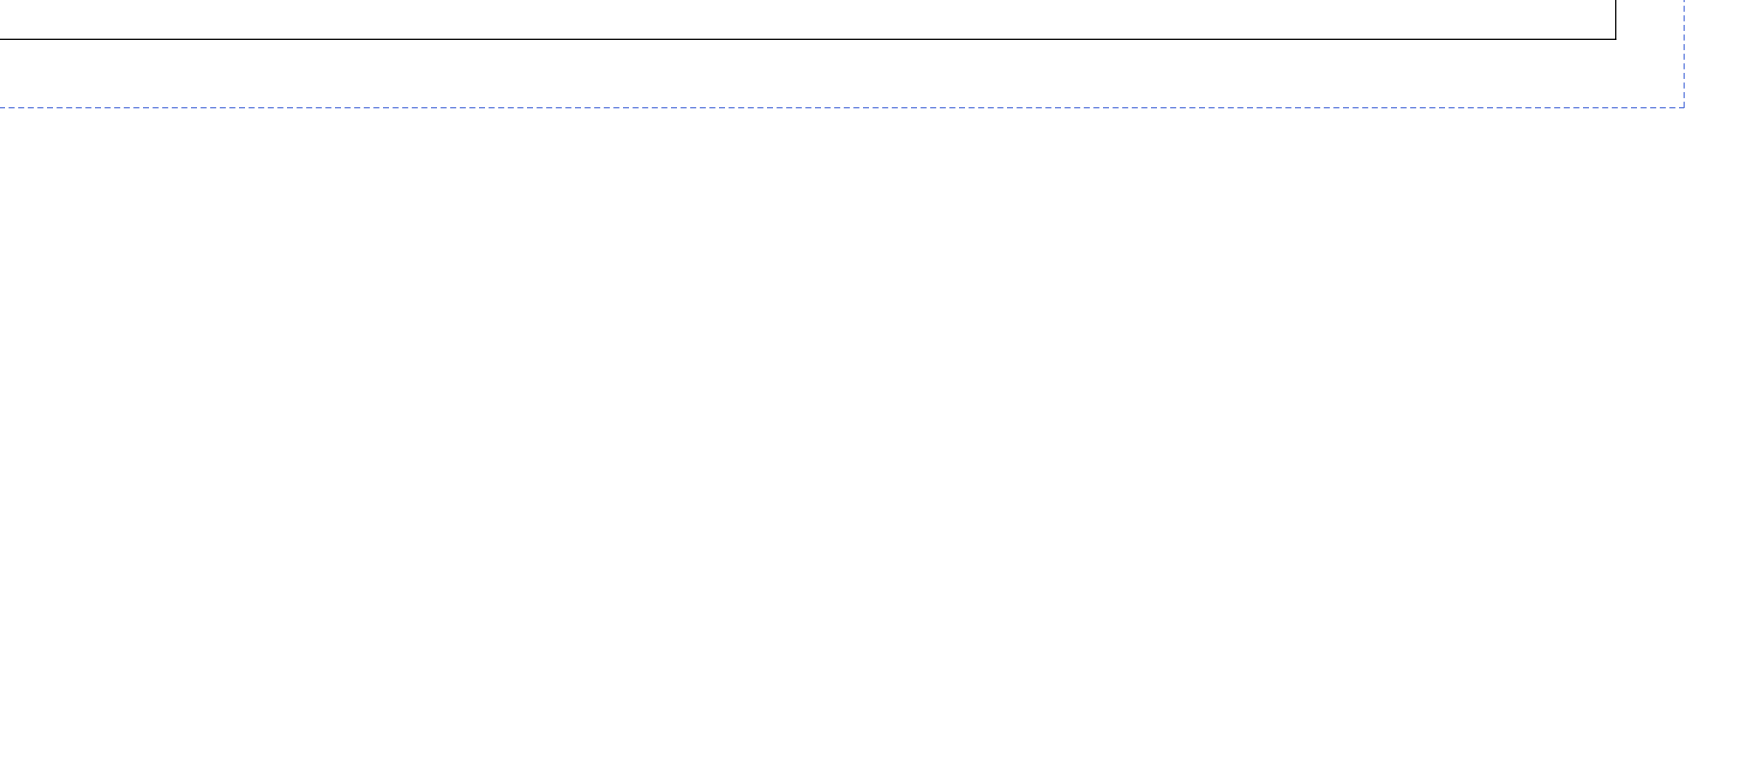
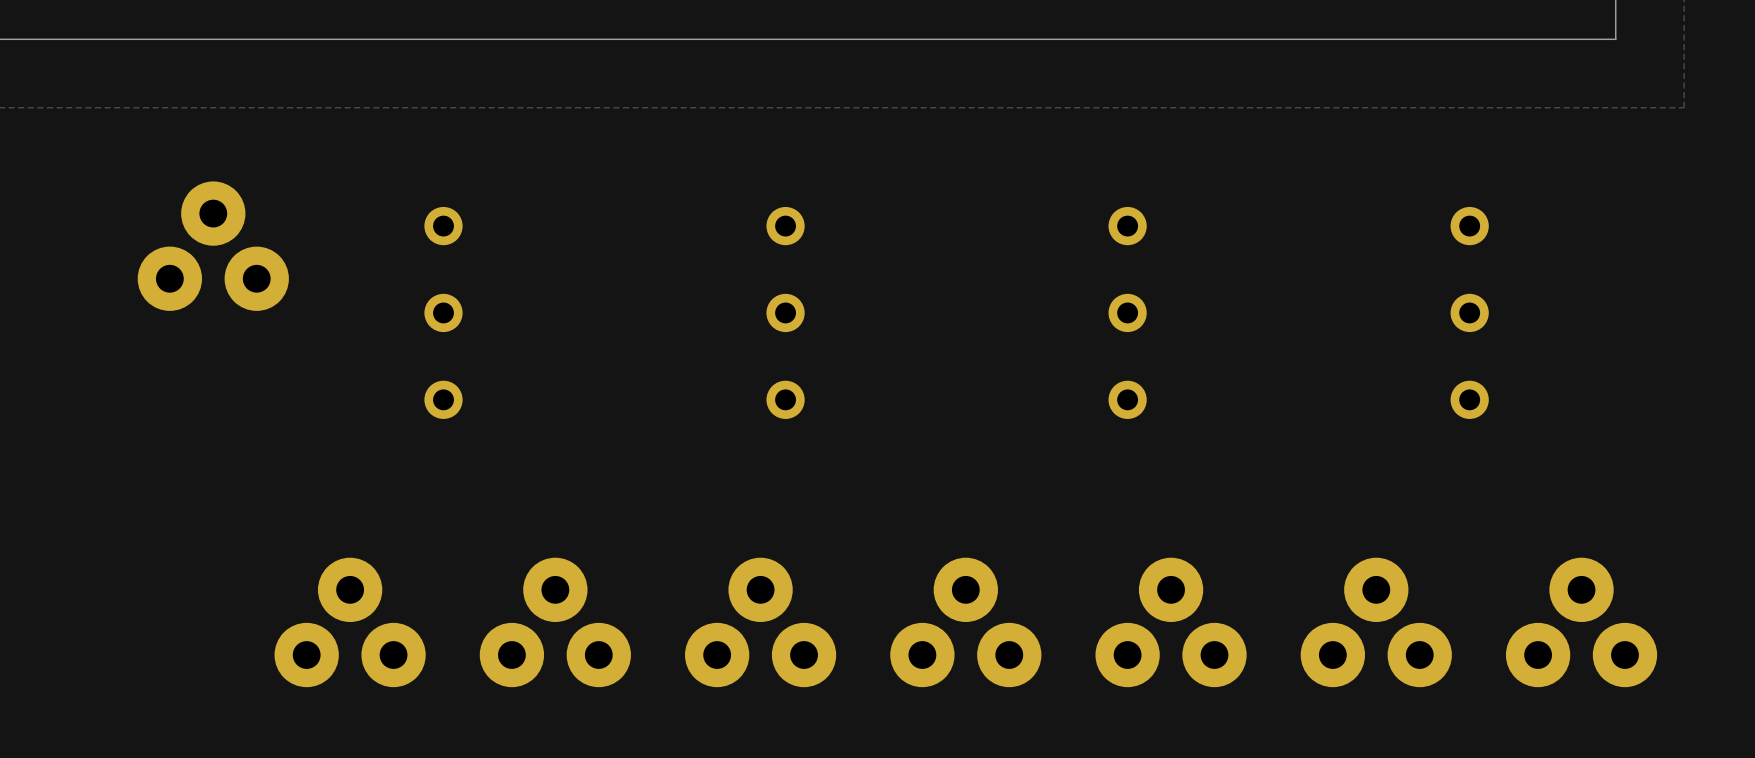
part: none -> (213, 246)
part: none -> (443, 312)
part: none -> (785, 312)
part: none -> (1127, 312)
part: none -> (1469, 312)
part: none -> (350, 622)
part: none -> (555, 622)
part: none -> (760, 622)
part: none -> (965, 622)
part: none -> (1171, 622)
part: none -> (1376, 622)
part: none -> (1581, 622)

